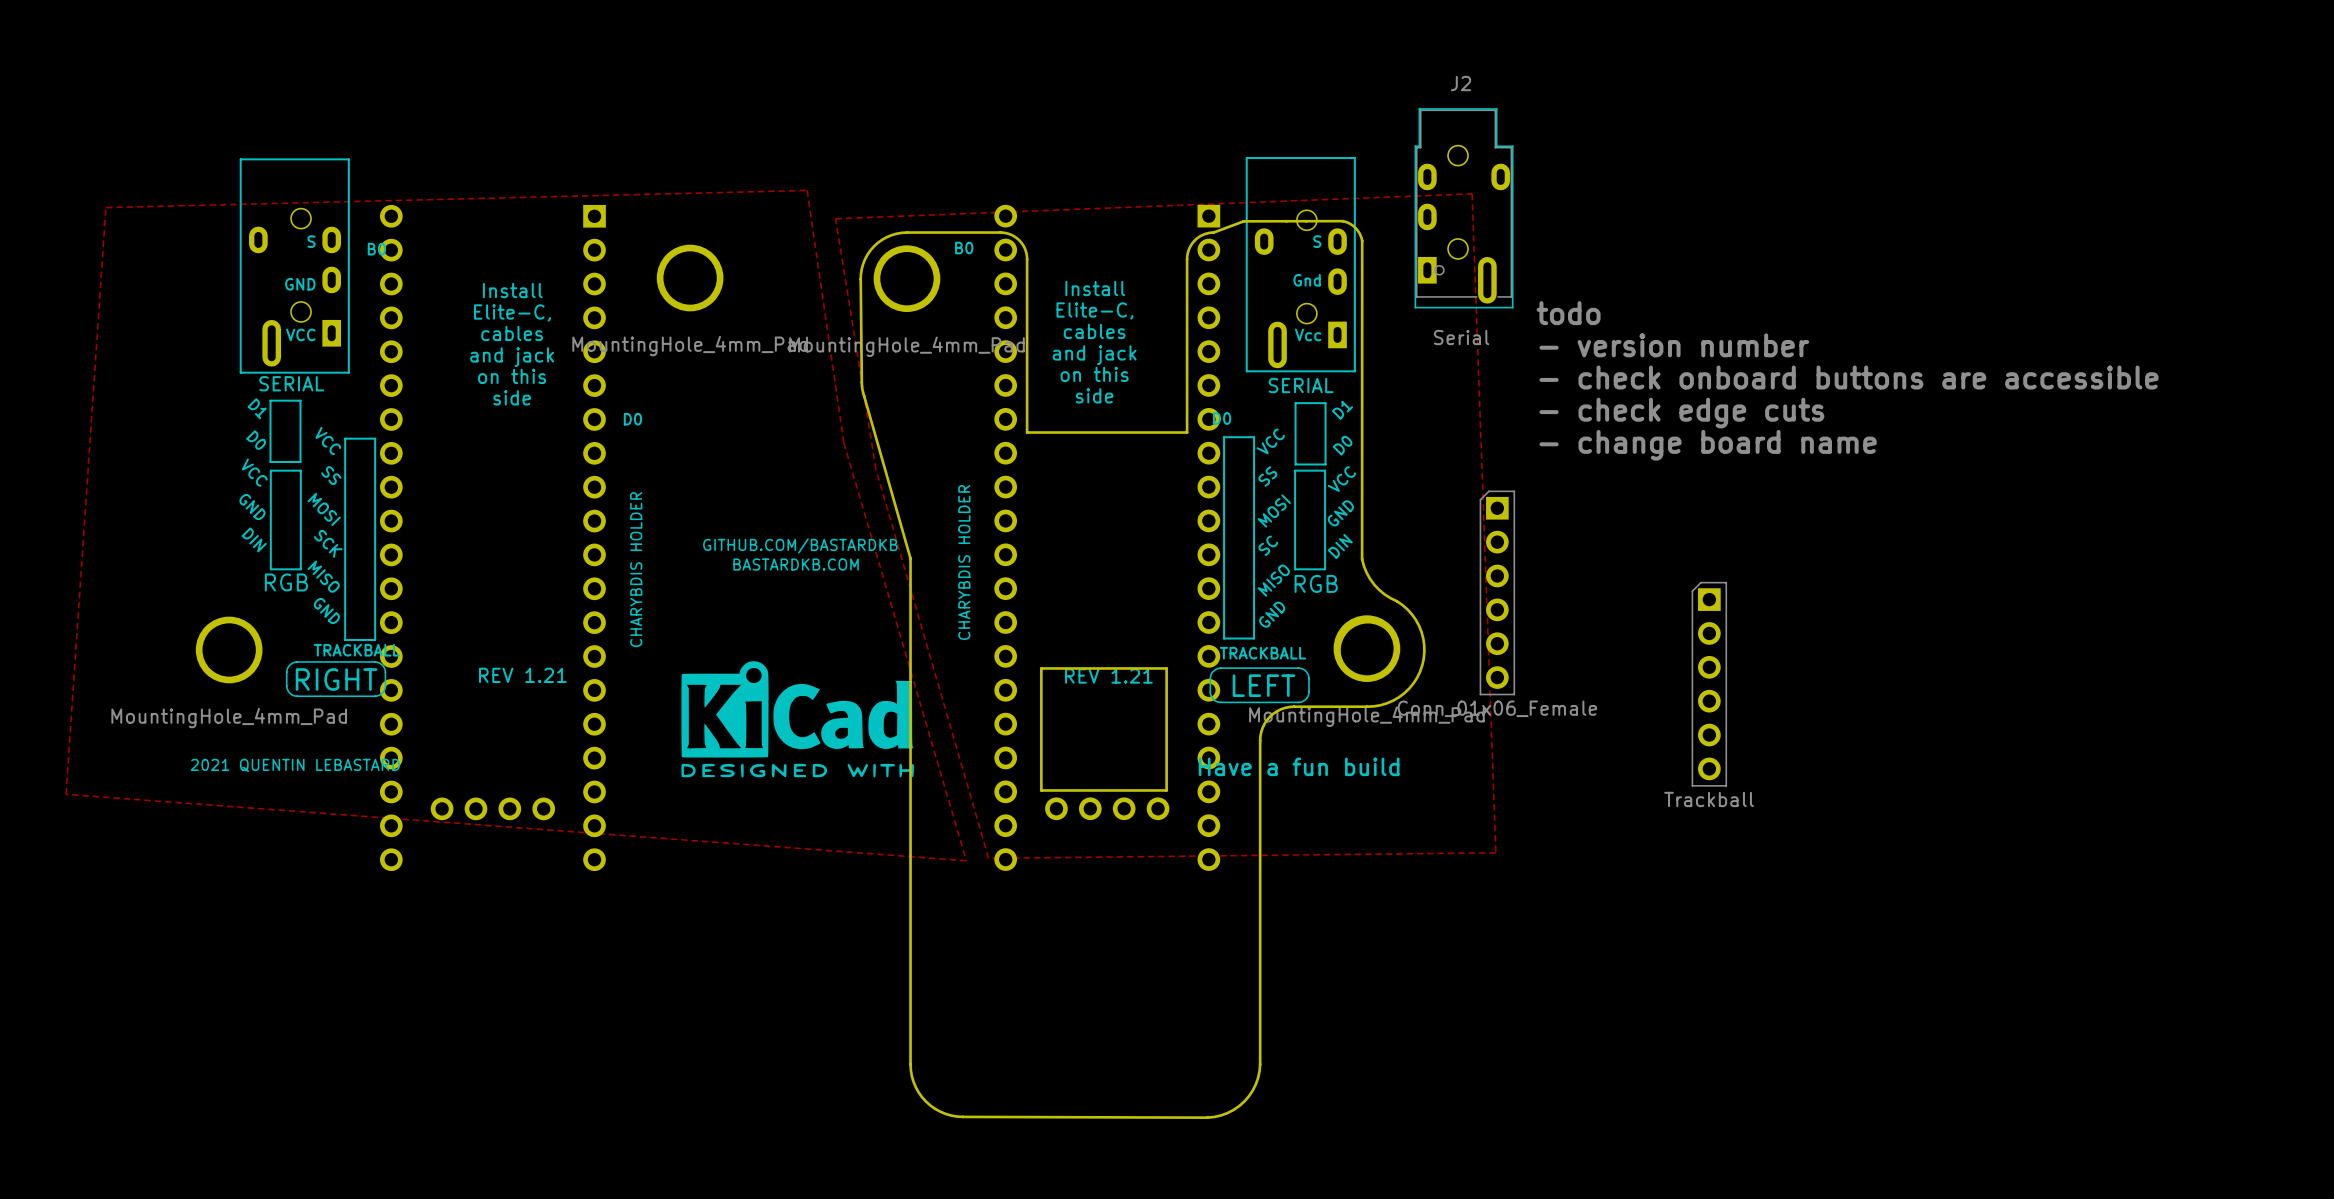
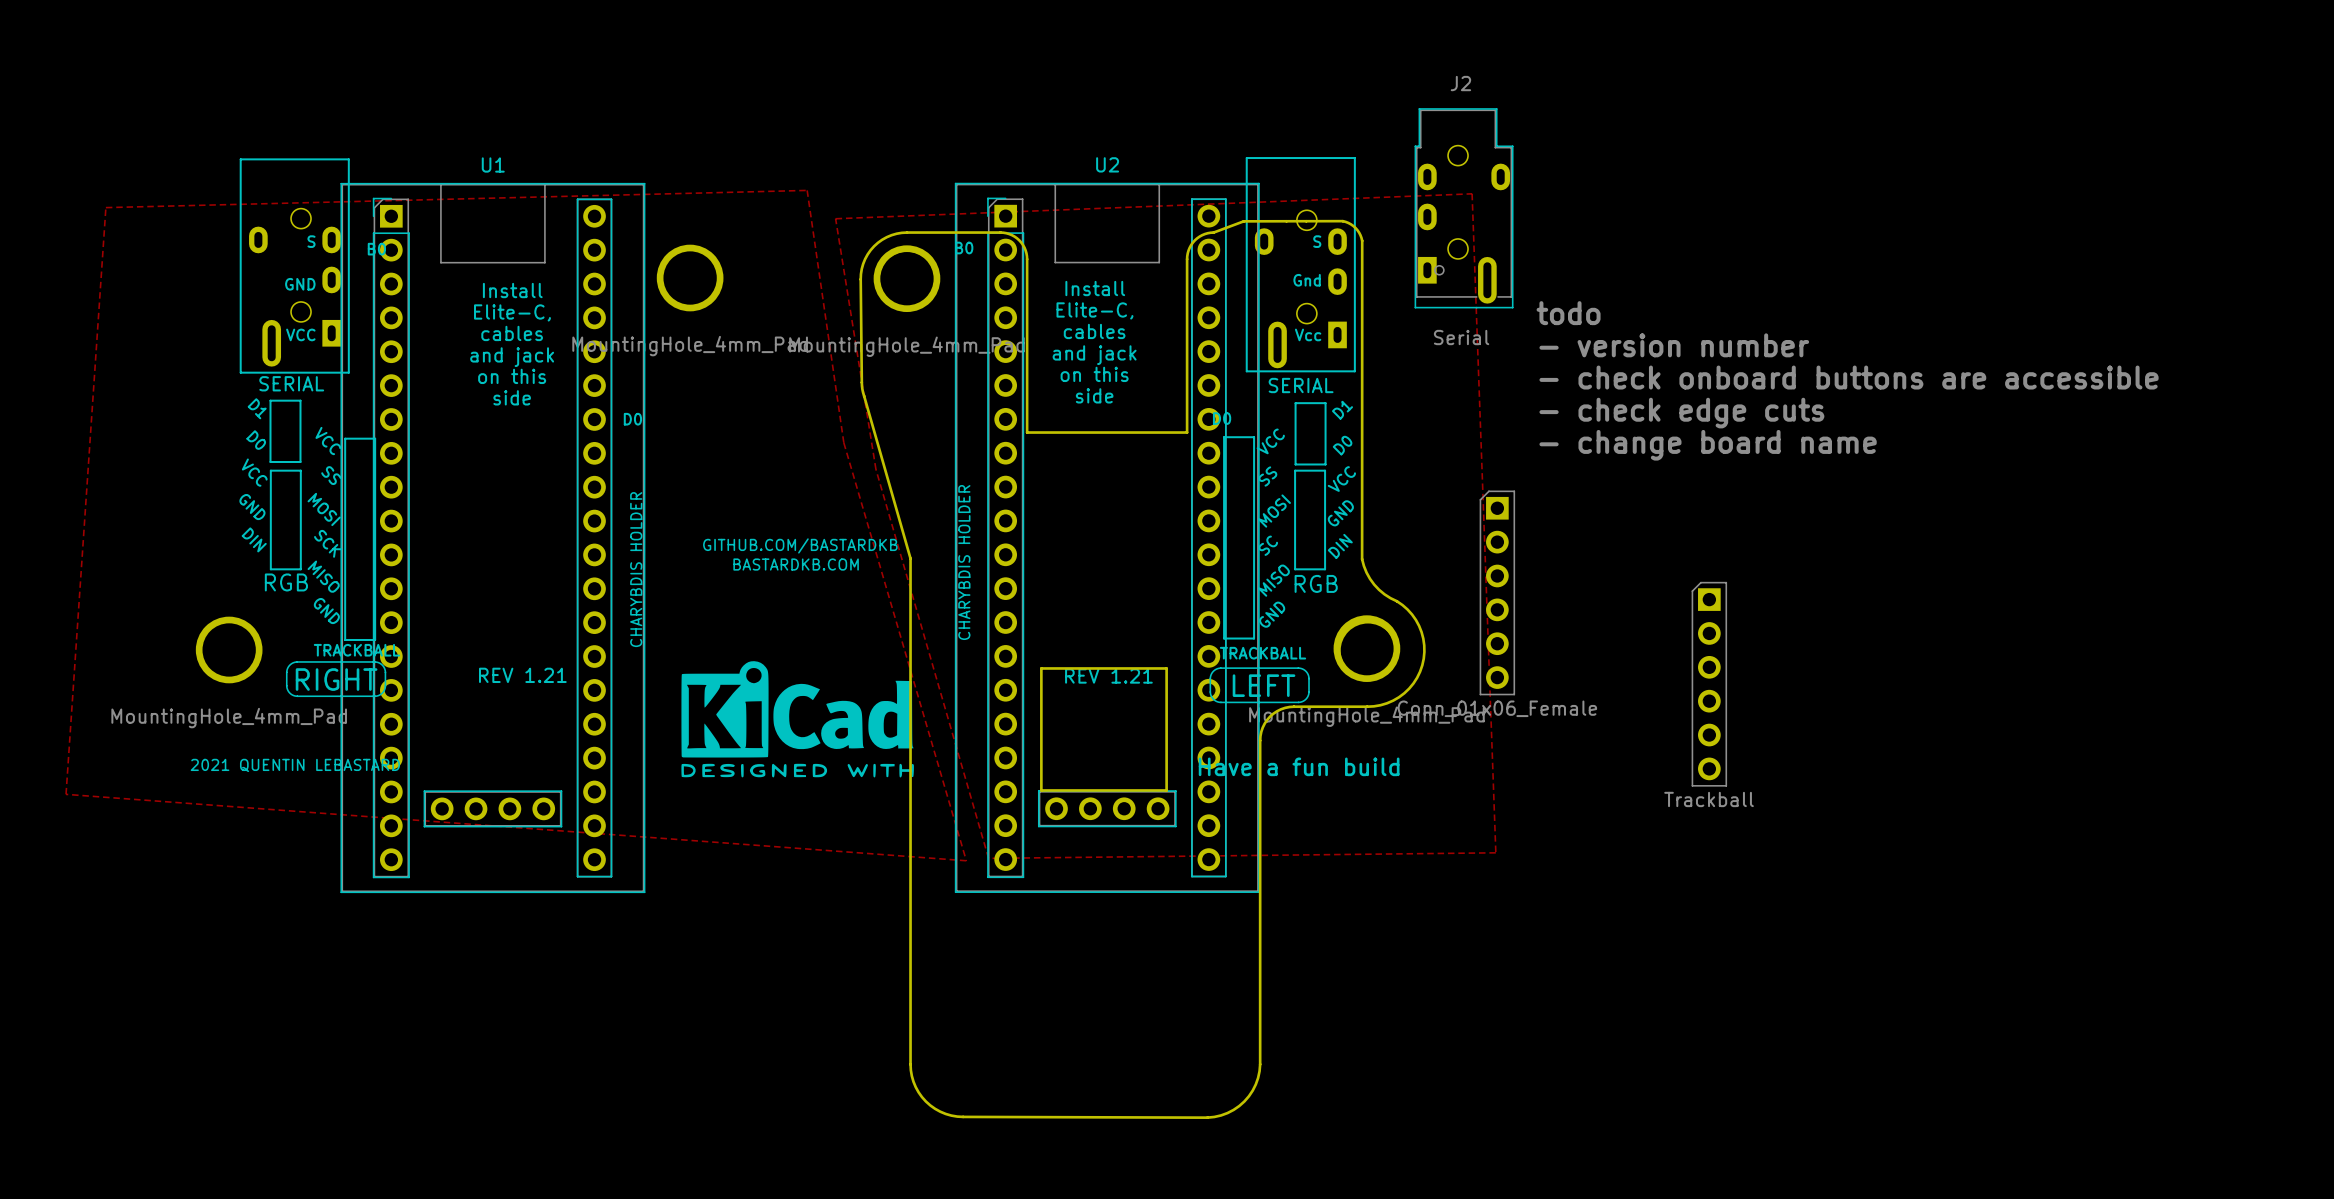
U1 side: bottom (492, 537) -> top (492, 537)
U2 side: bottom (1107, 537) -> top (1107, 537)

